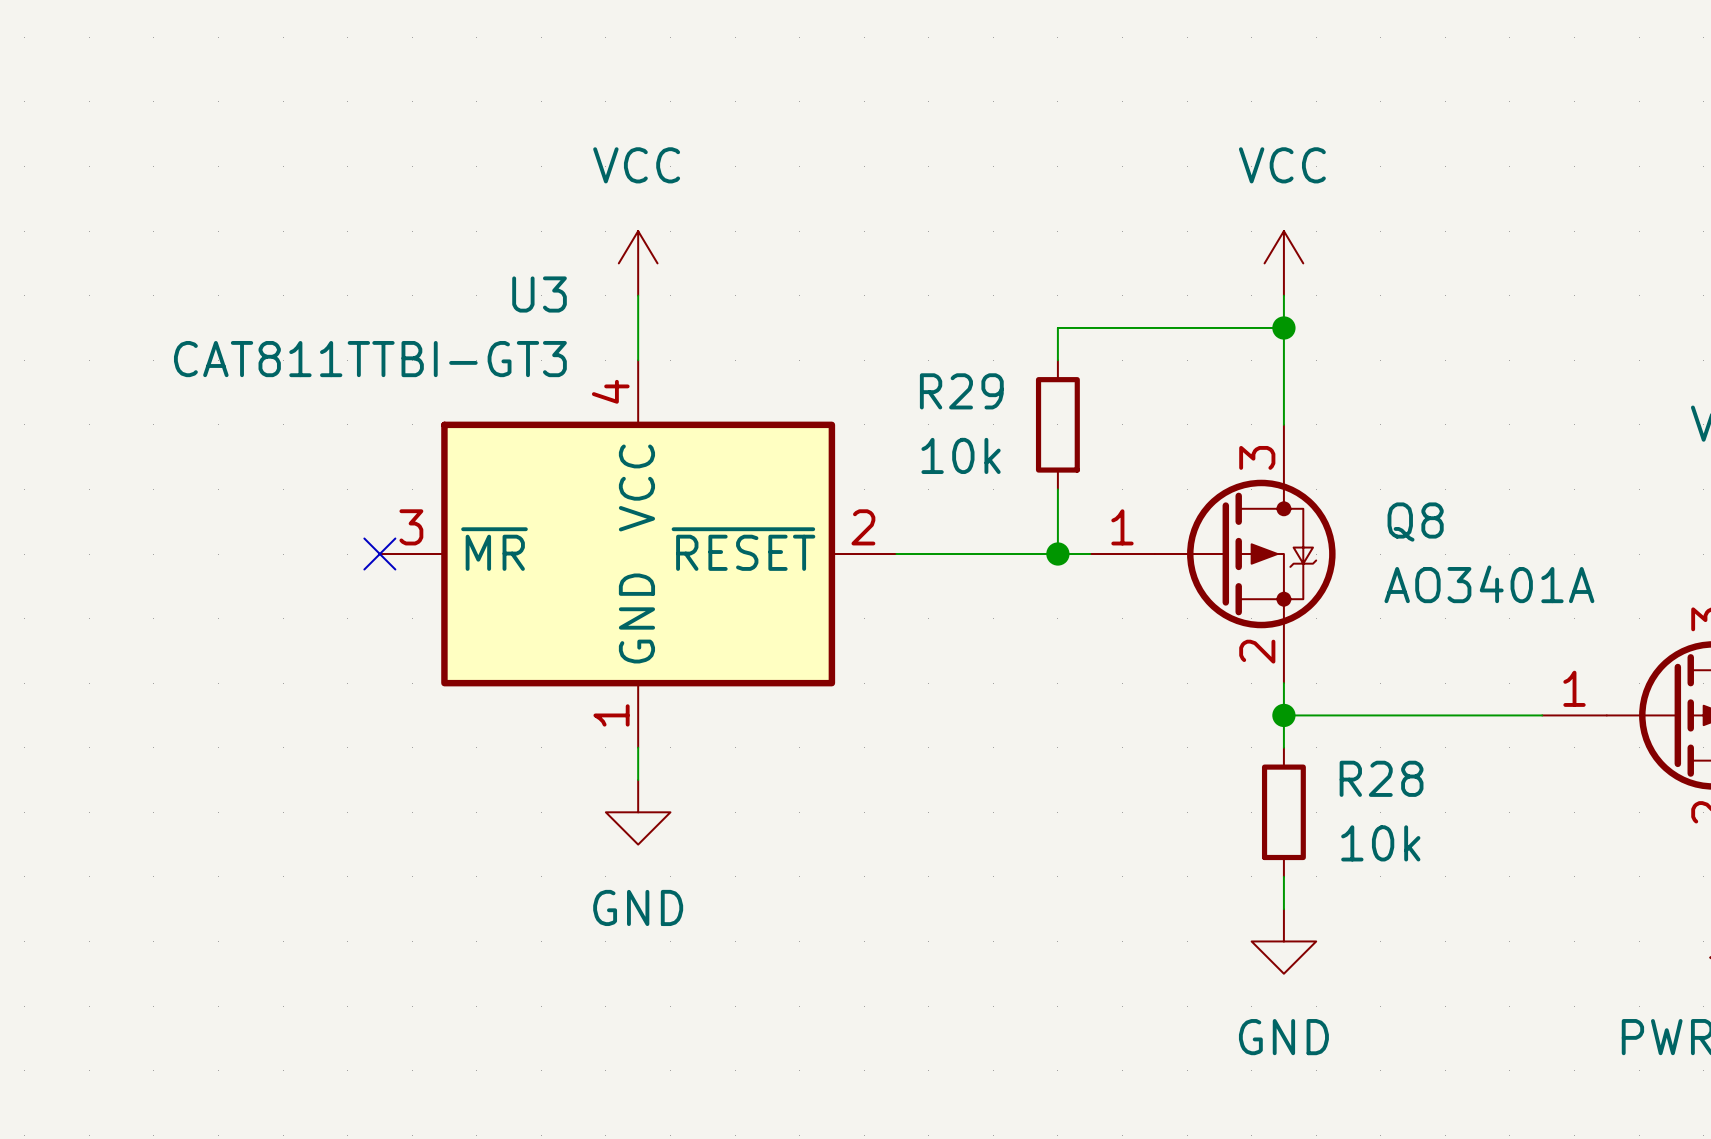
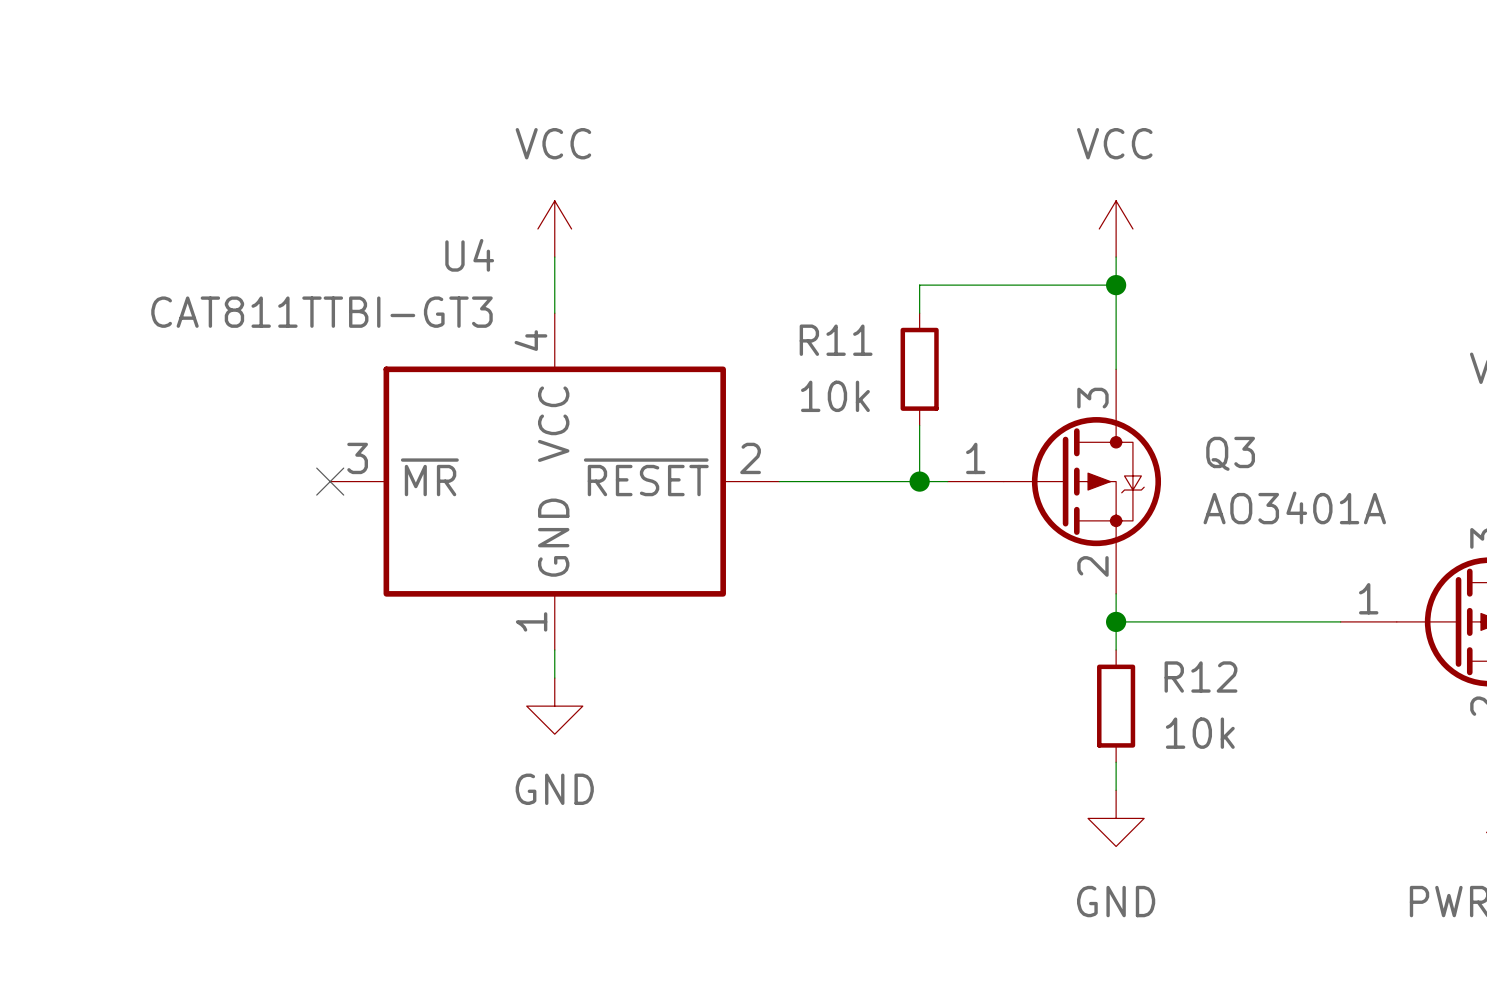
U3 name: U3 (539, 294) -> U4 (469, 255)
R29 name: R29 (961, 391) -> R11 (836, 340)
Q8 name: Q8 (1415, 522) -> Q3 (1230, 453)
R28 name: R28 (1381, 778) -> R12 (1200, 677)

